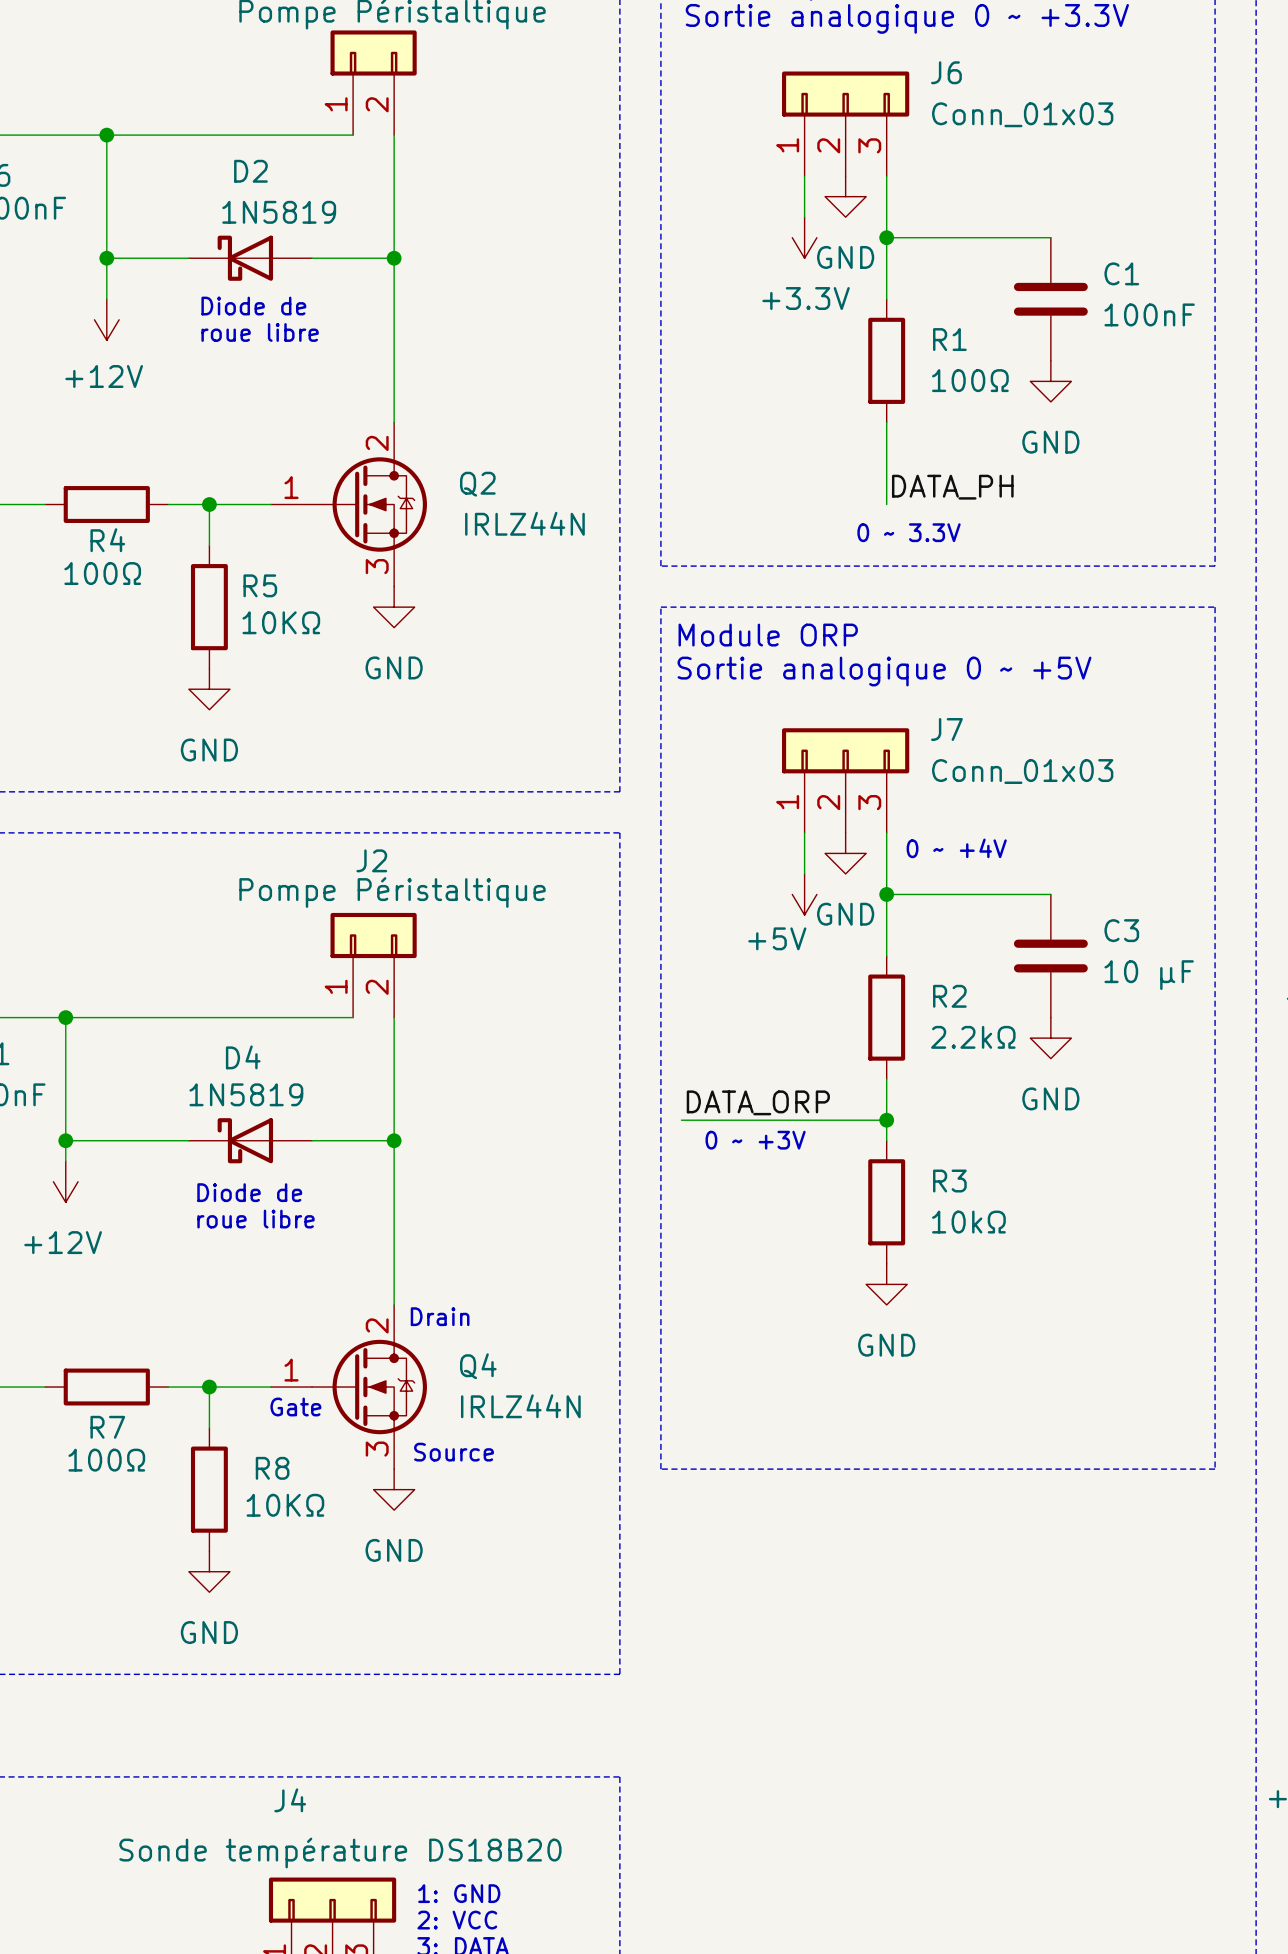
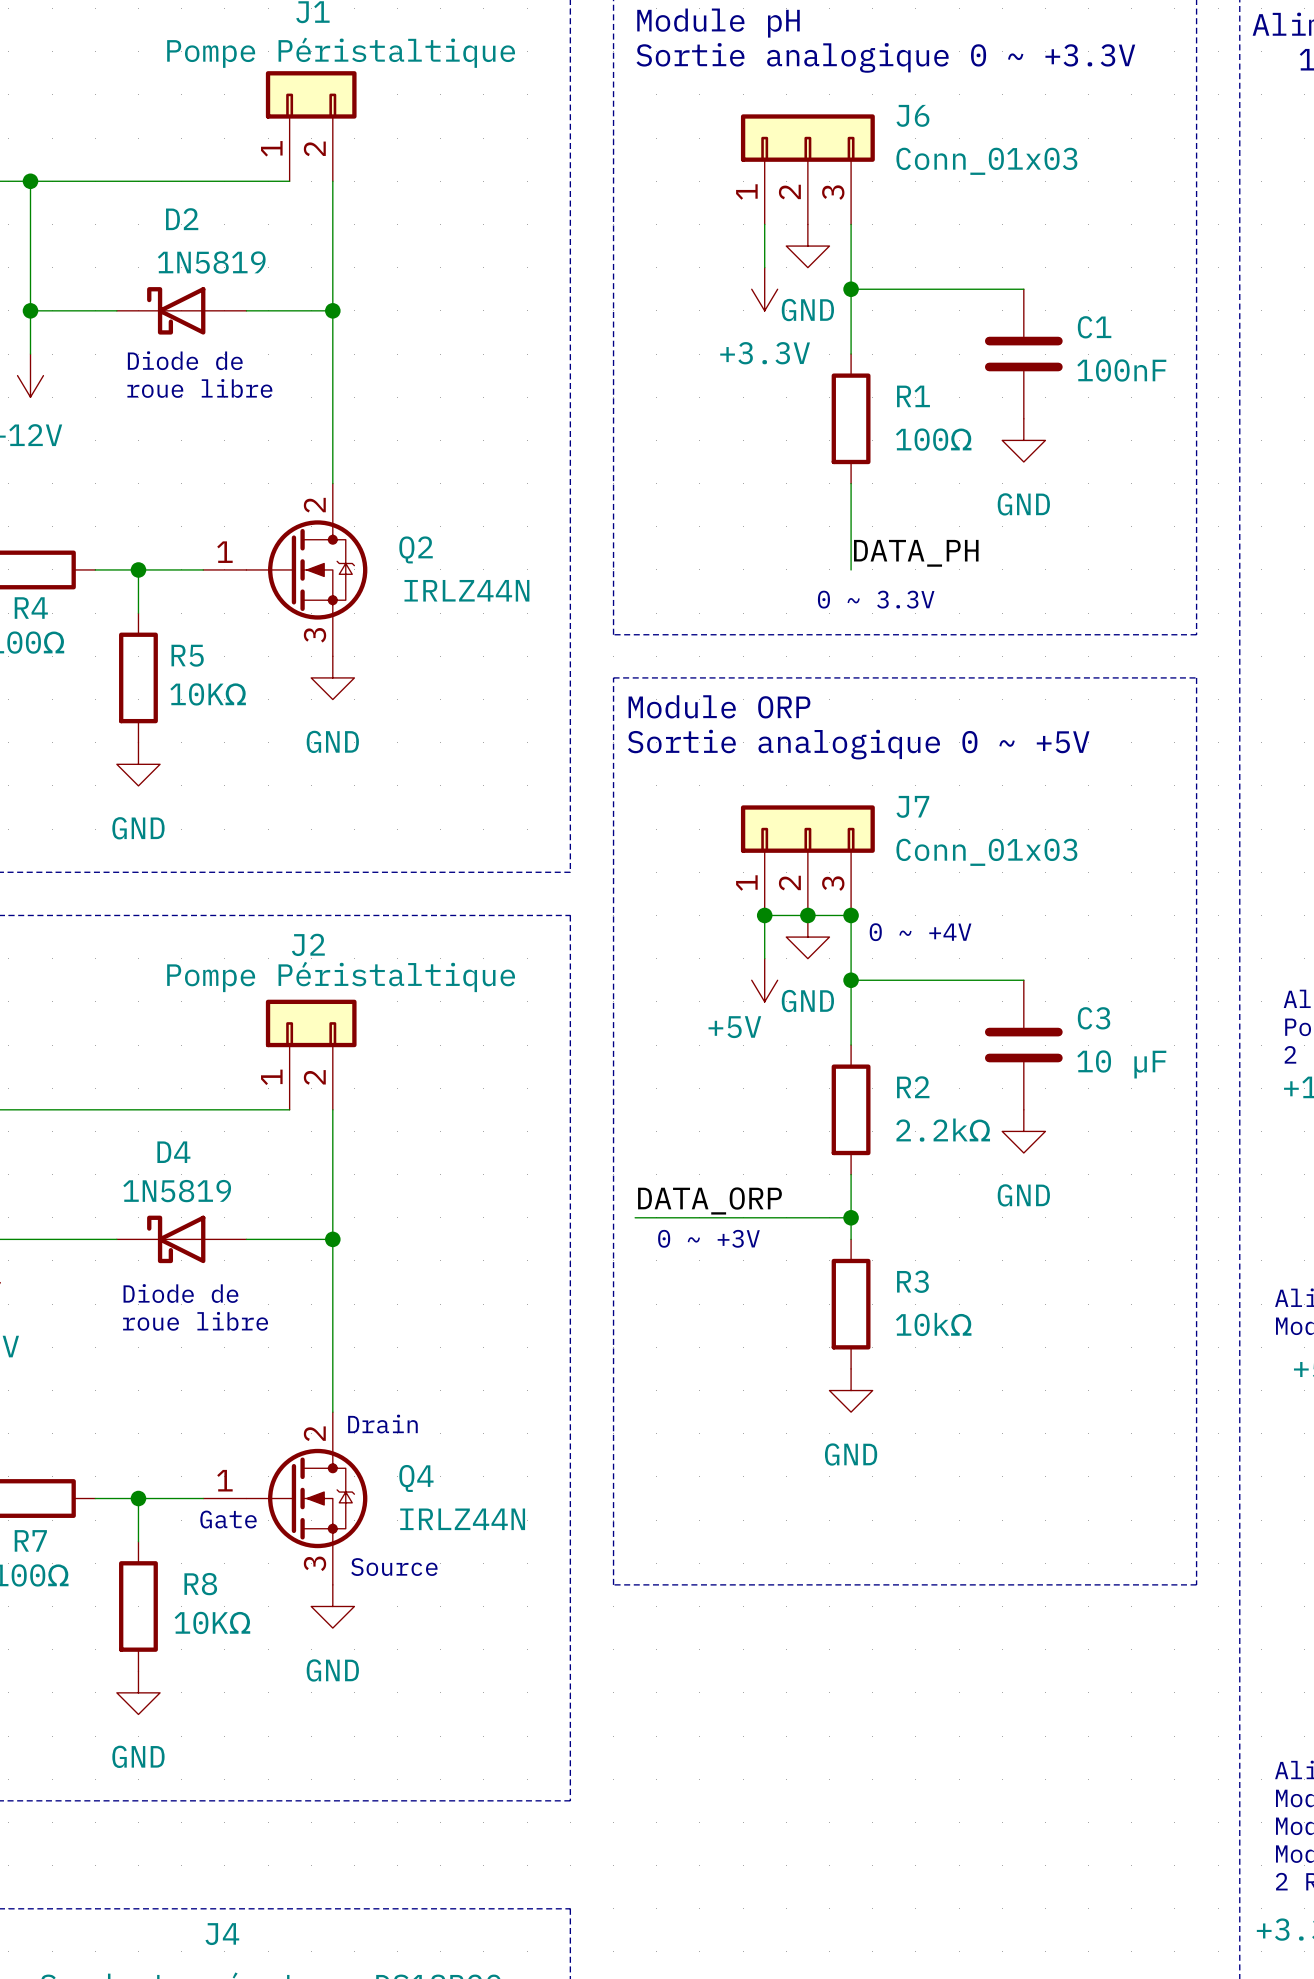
wire: none -> (764, 915) (851, 915)
junction: none -> (764, 915)
junction: none -> (807, 915)
junction: none -> (851, 915)

